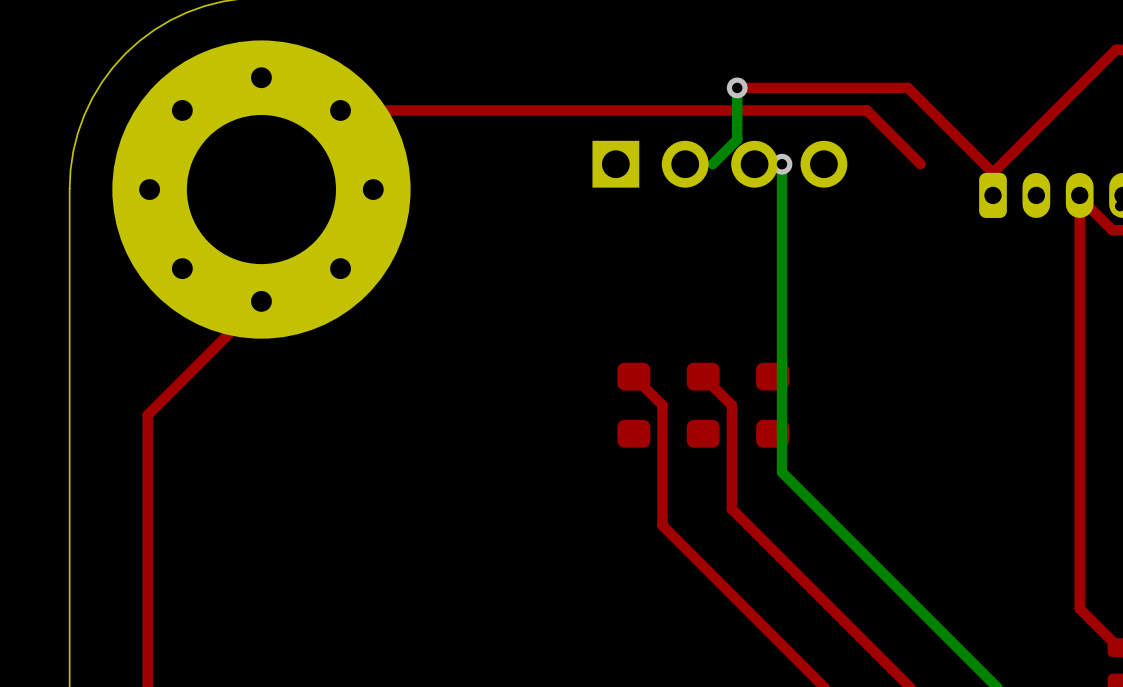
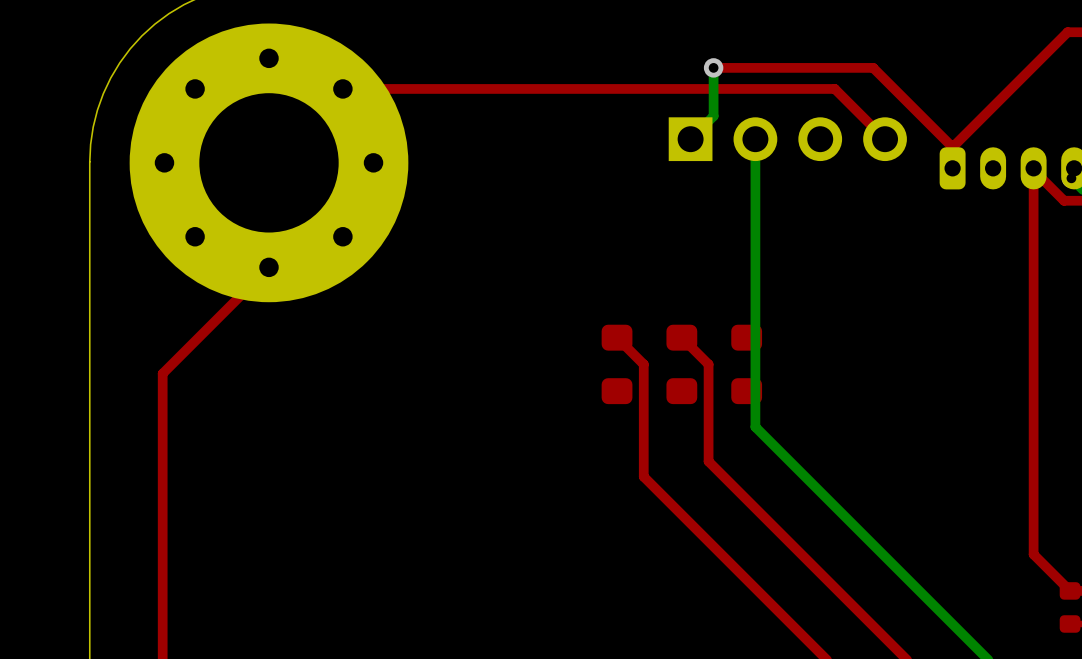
part position: (719, 164) -> (787, 139)

